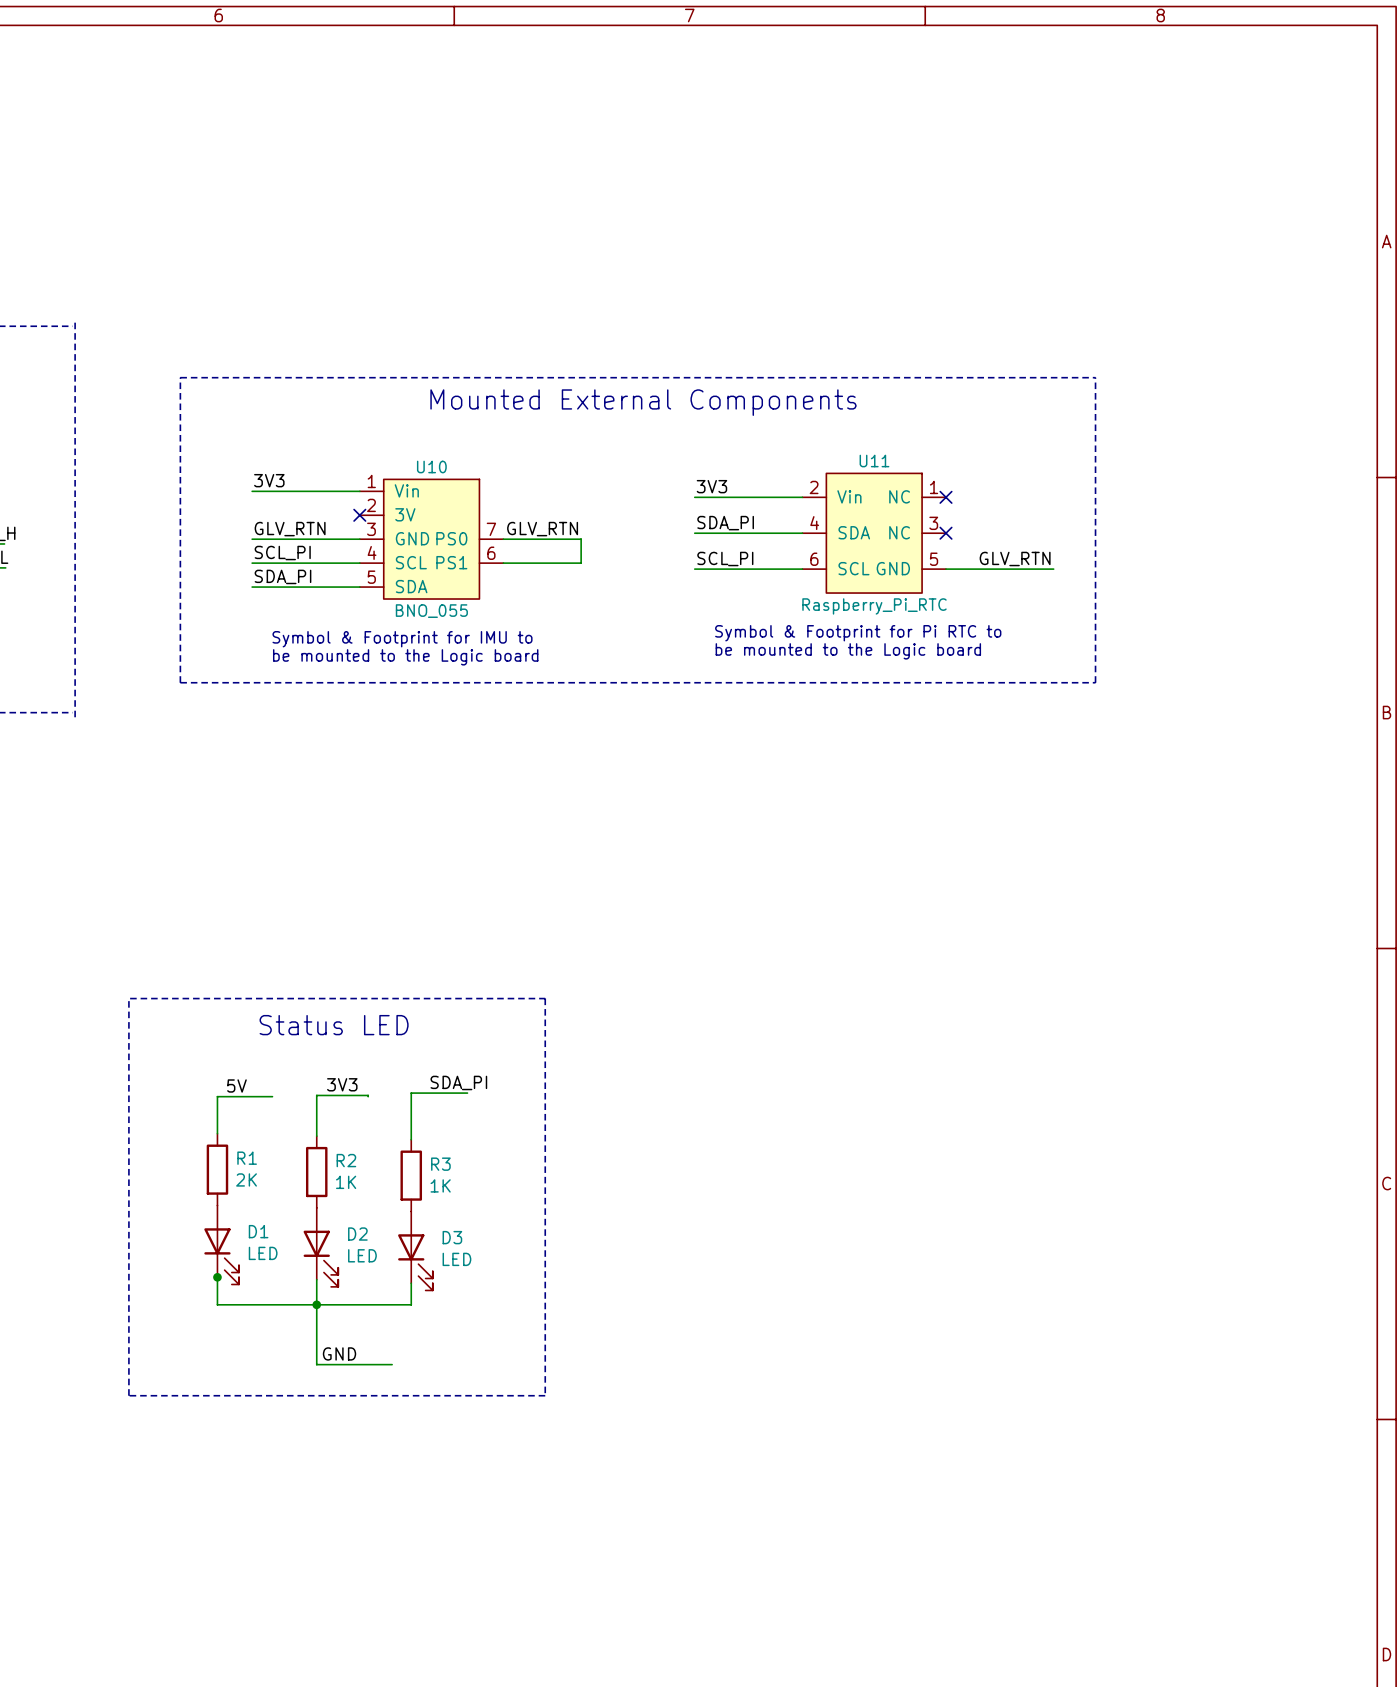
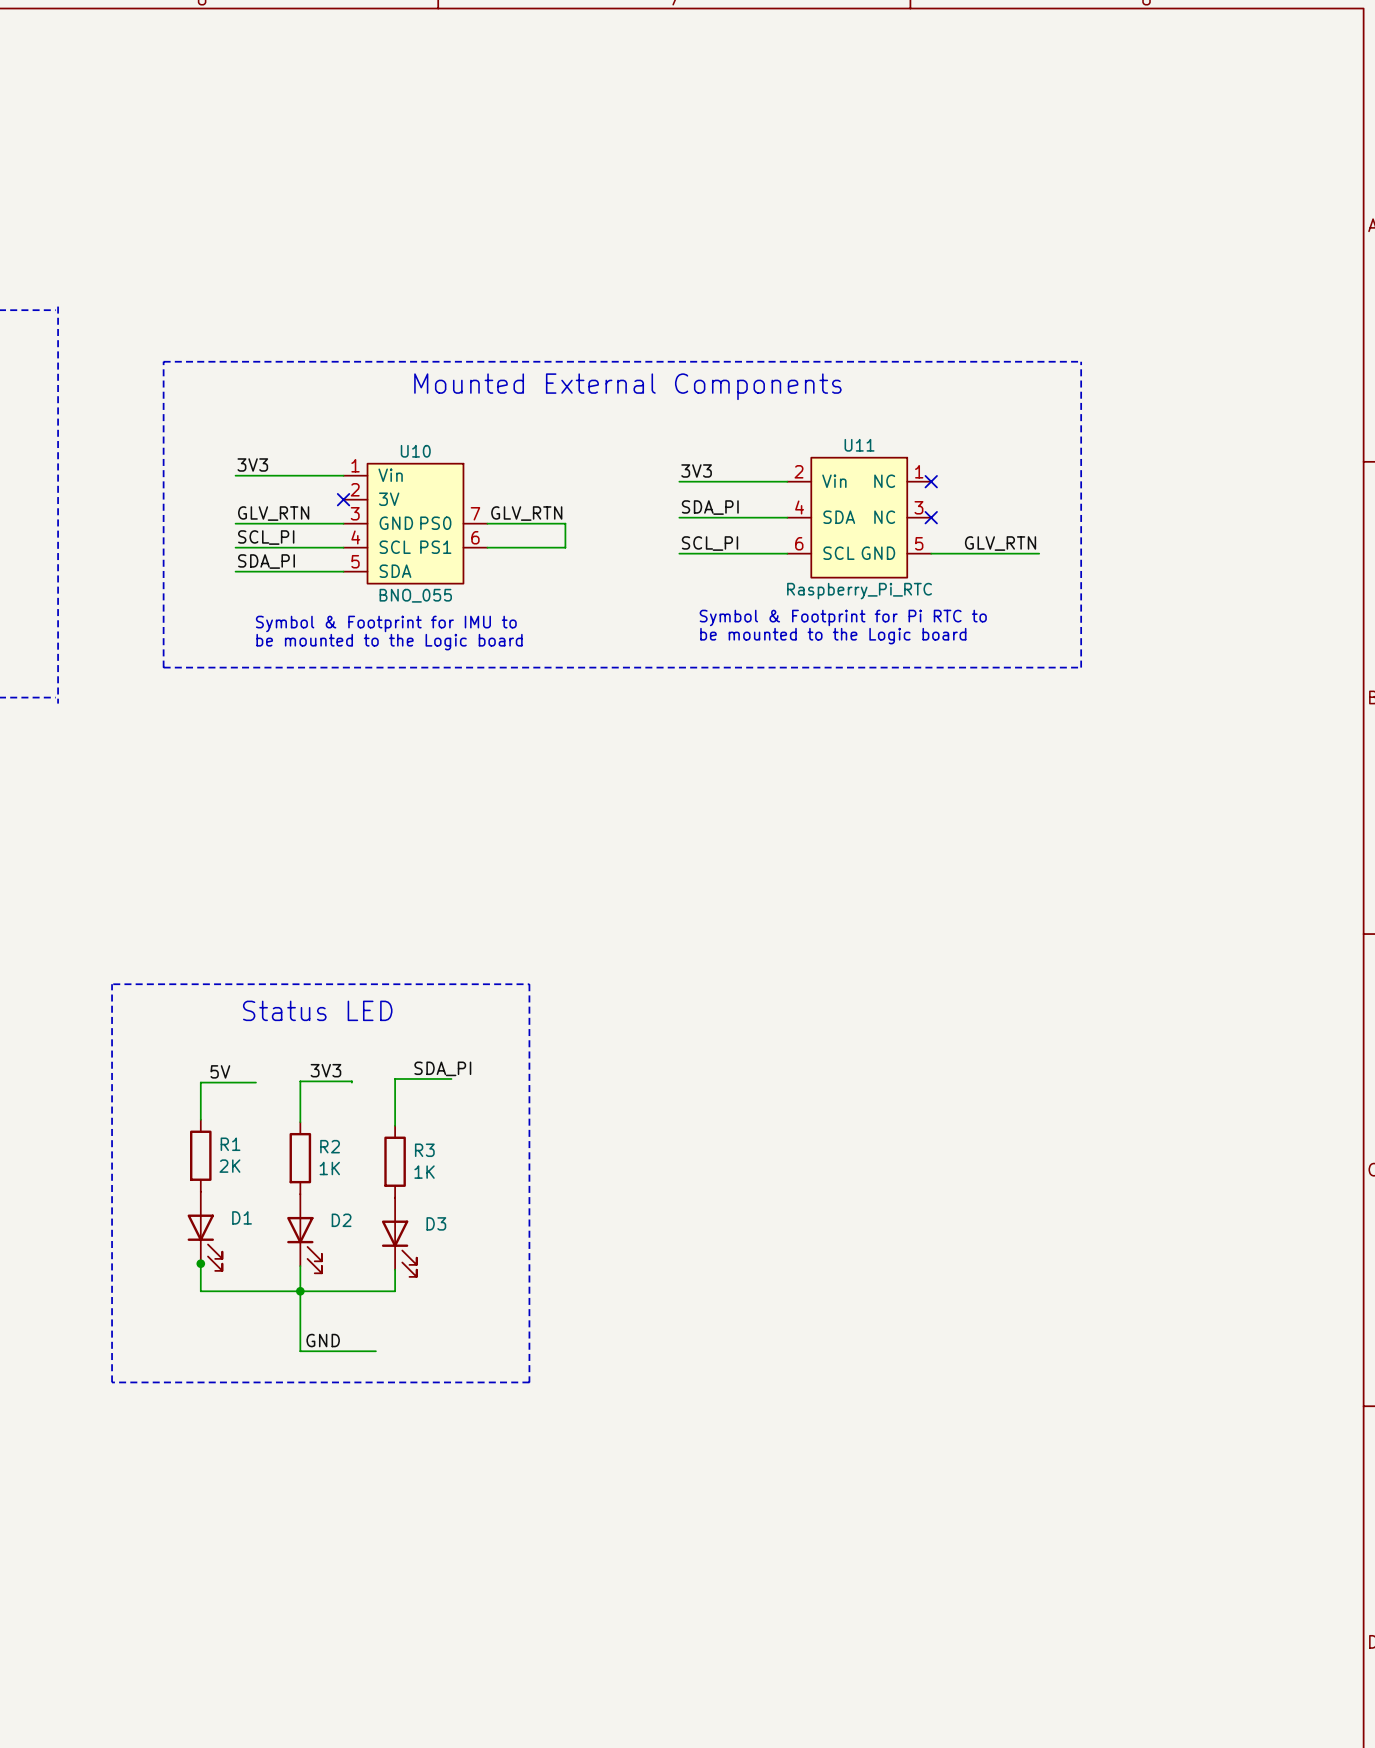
D1 value: LED (263, 1253) -> none
D2 value: LED (362, 1255) -> none
D3 value: LED (456, 1259) -> none

